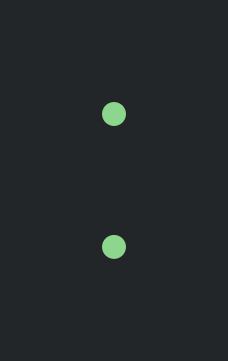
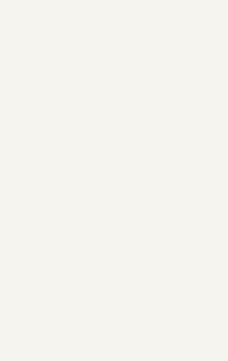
junction: (114, 114) -> none
junction: (114, 246) -> none

